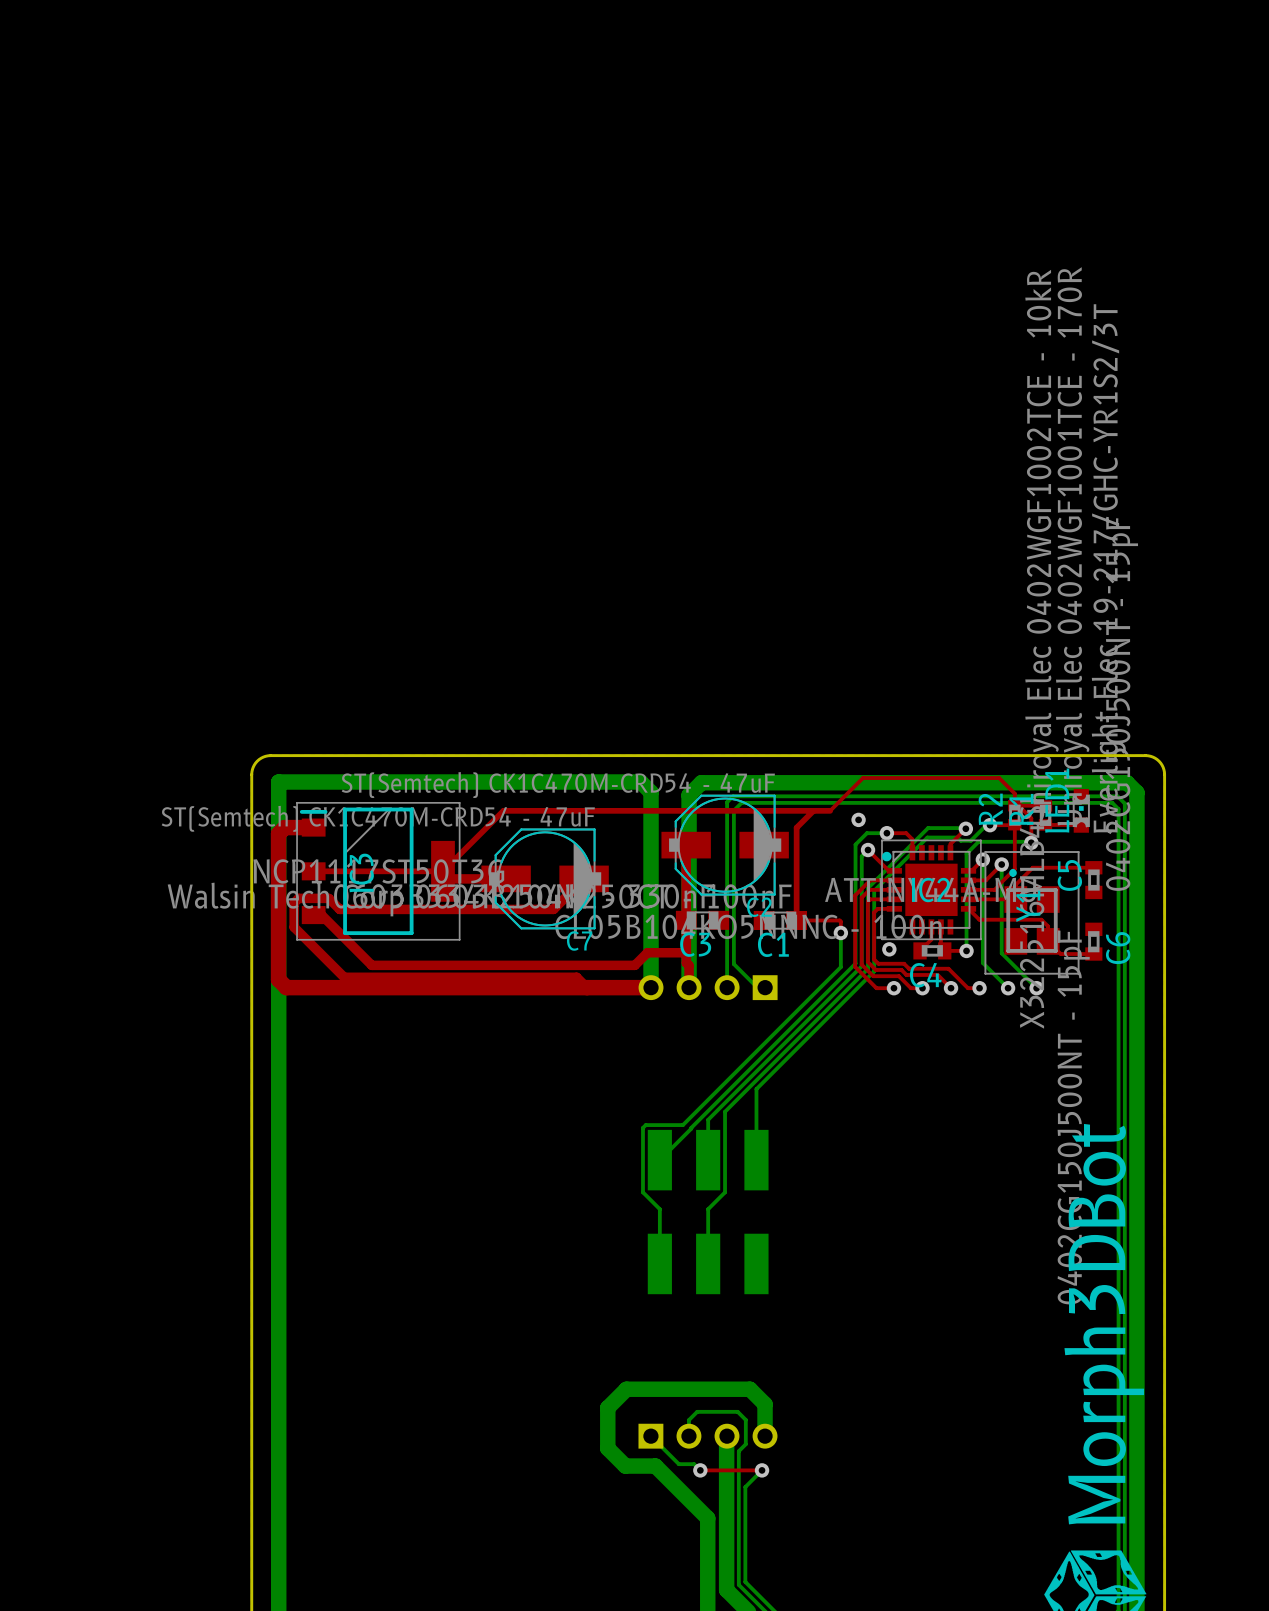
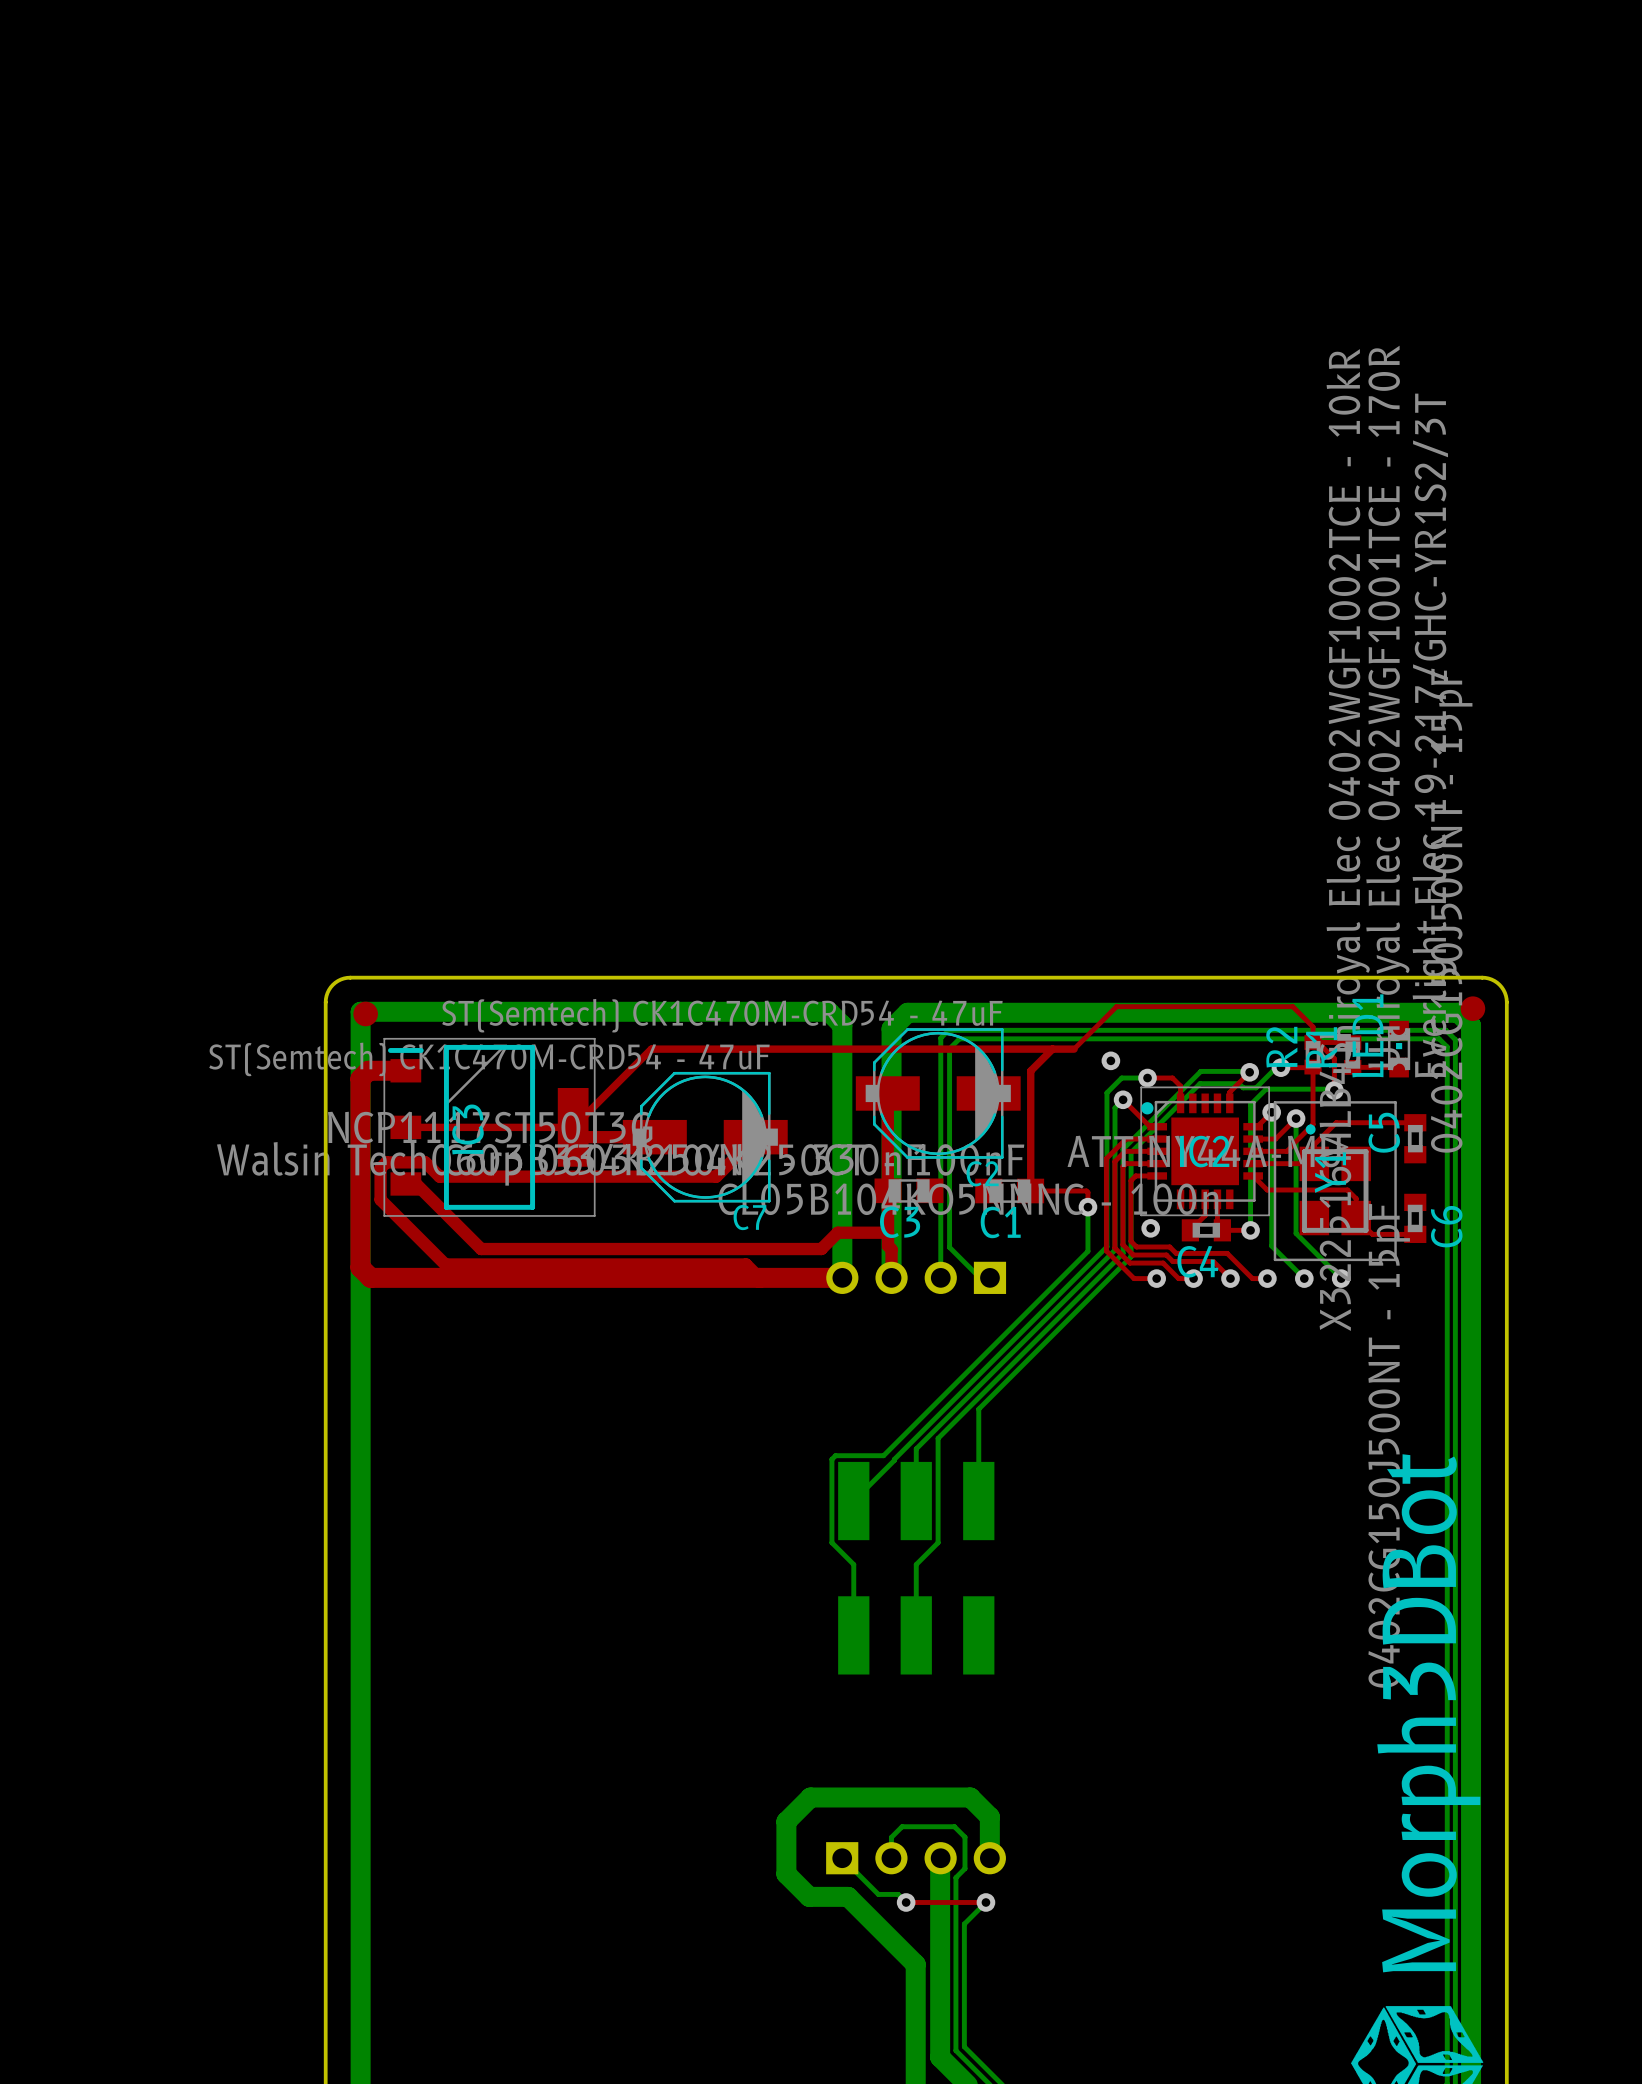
part: none -> (1472, 1008)
part: none -> (365, 1013)

